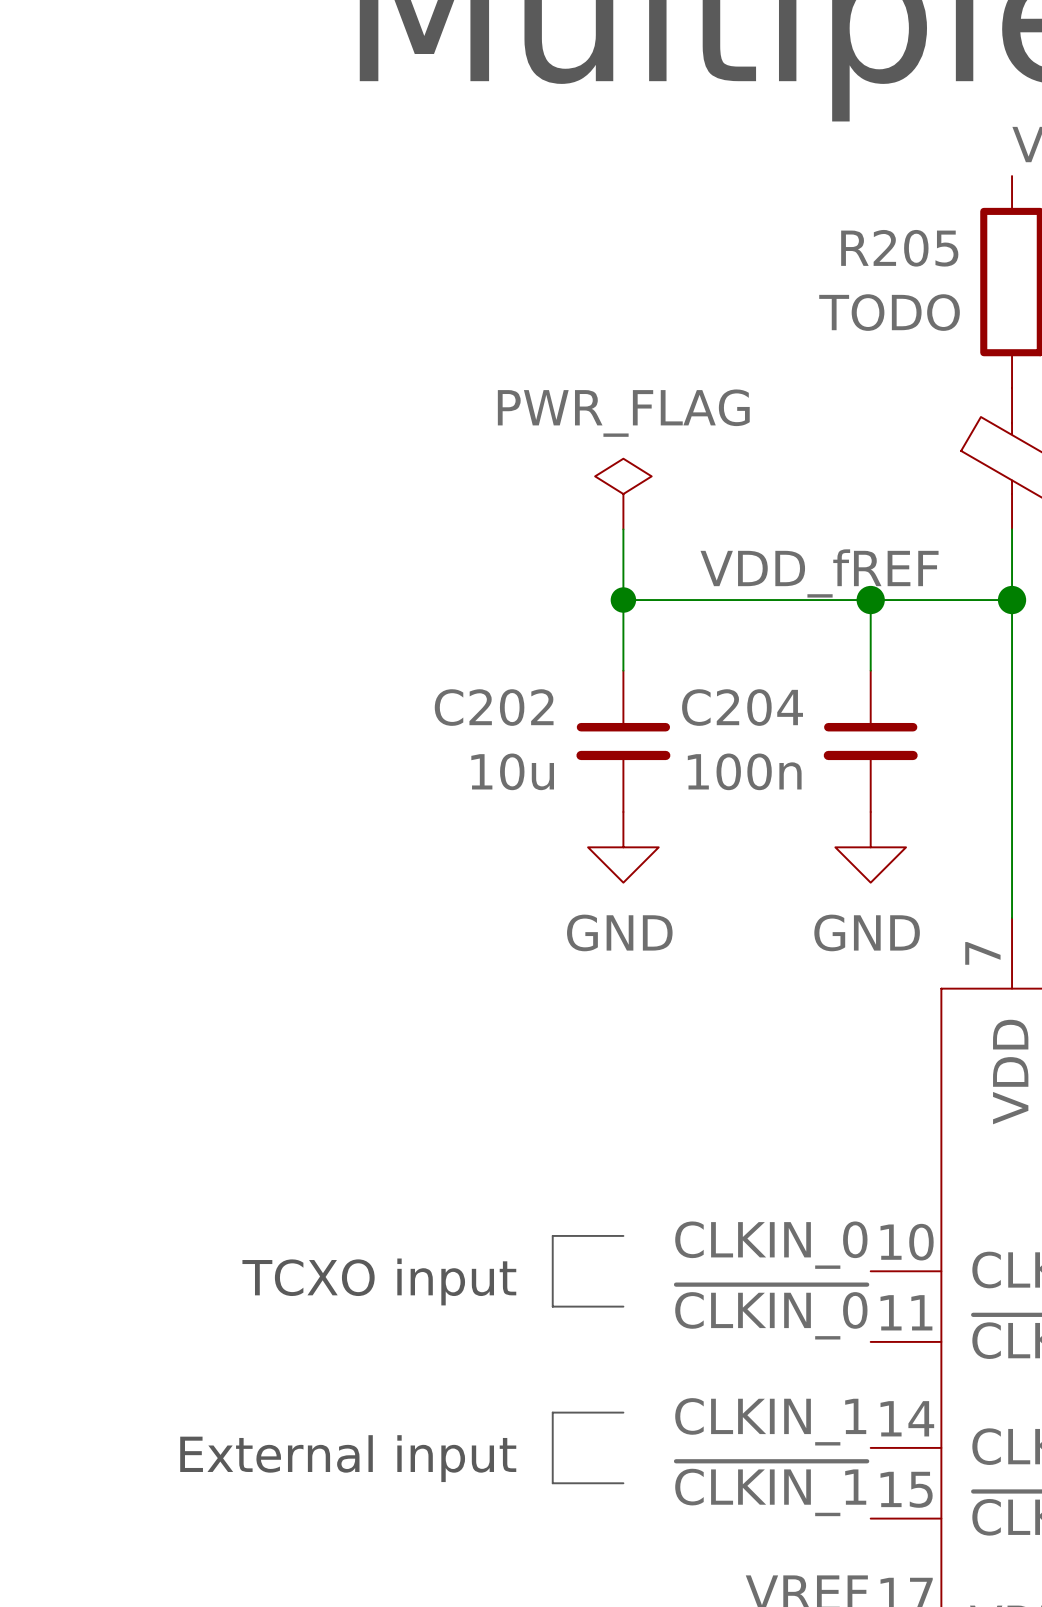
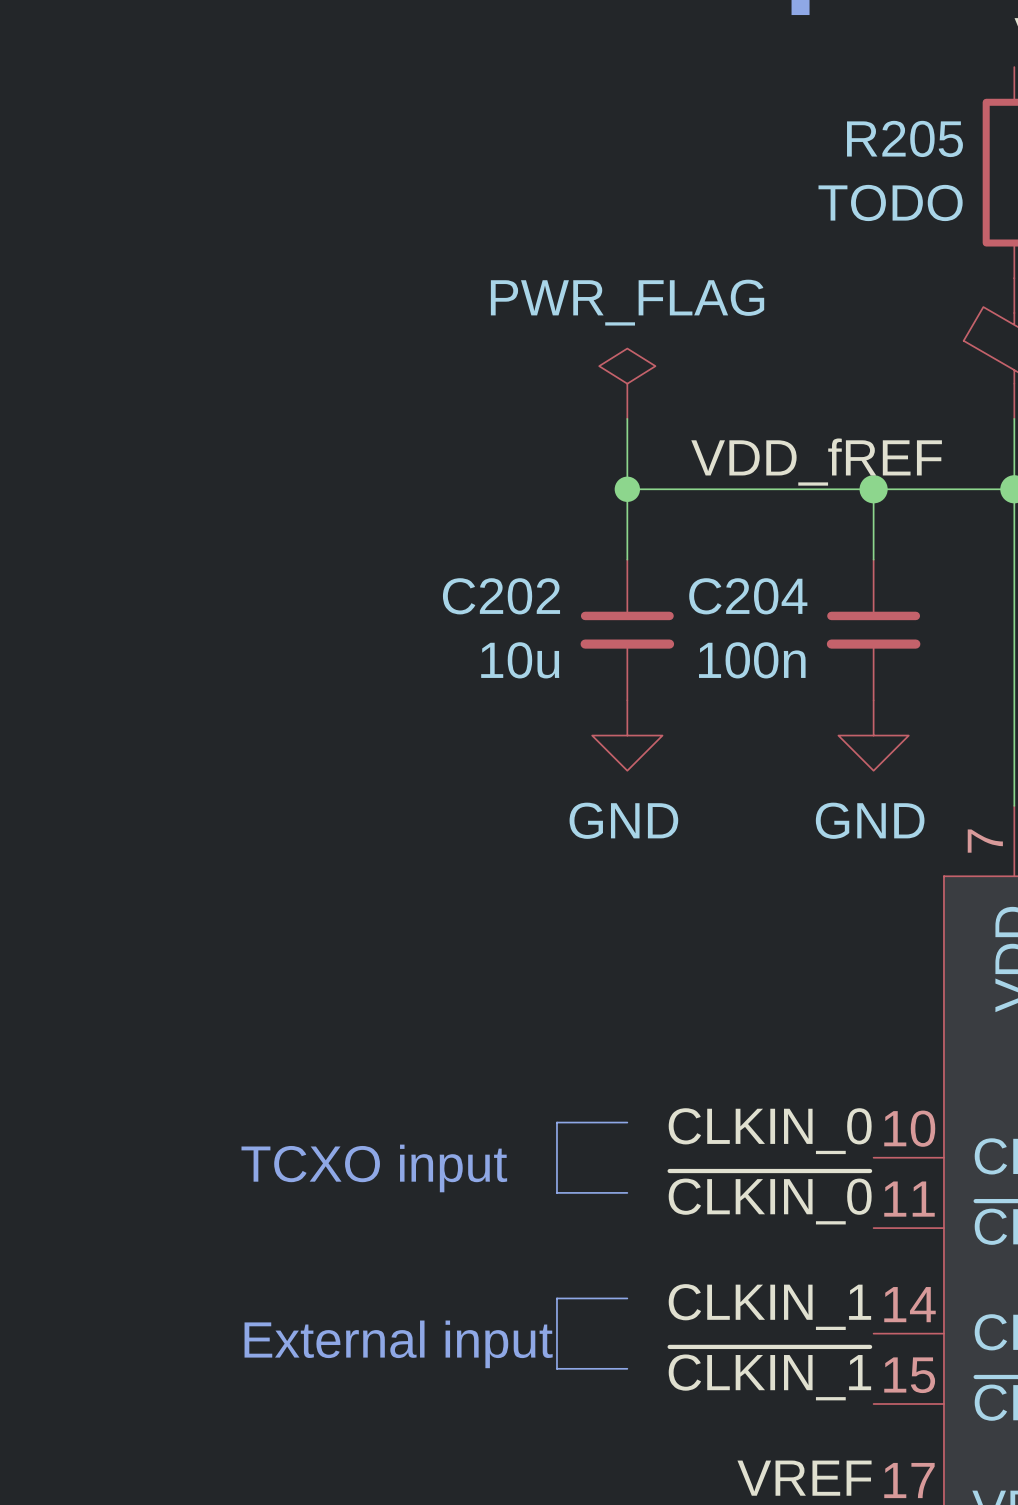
text position: TCXO input (379, 1281) -> TCXO input (374, 1168)
text position: External input (348, 1458) -> External input (398, 1344)

